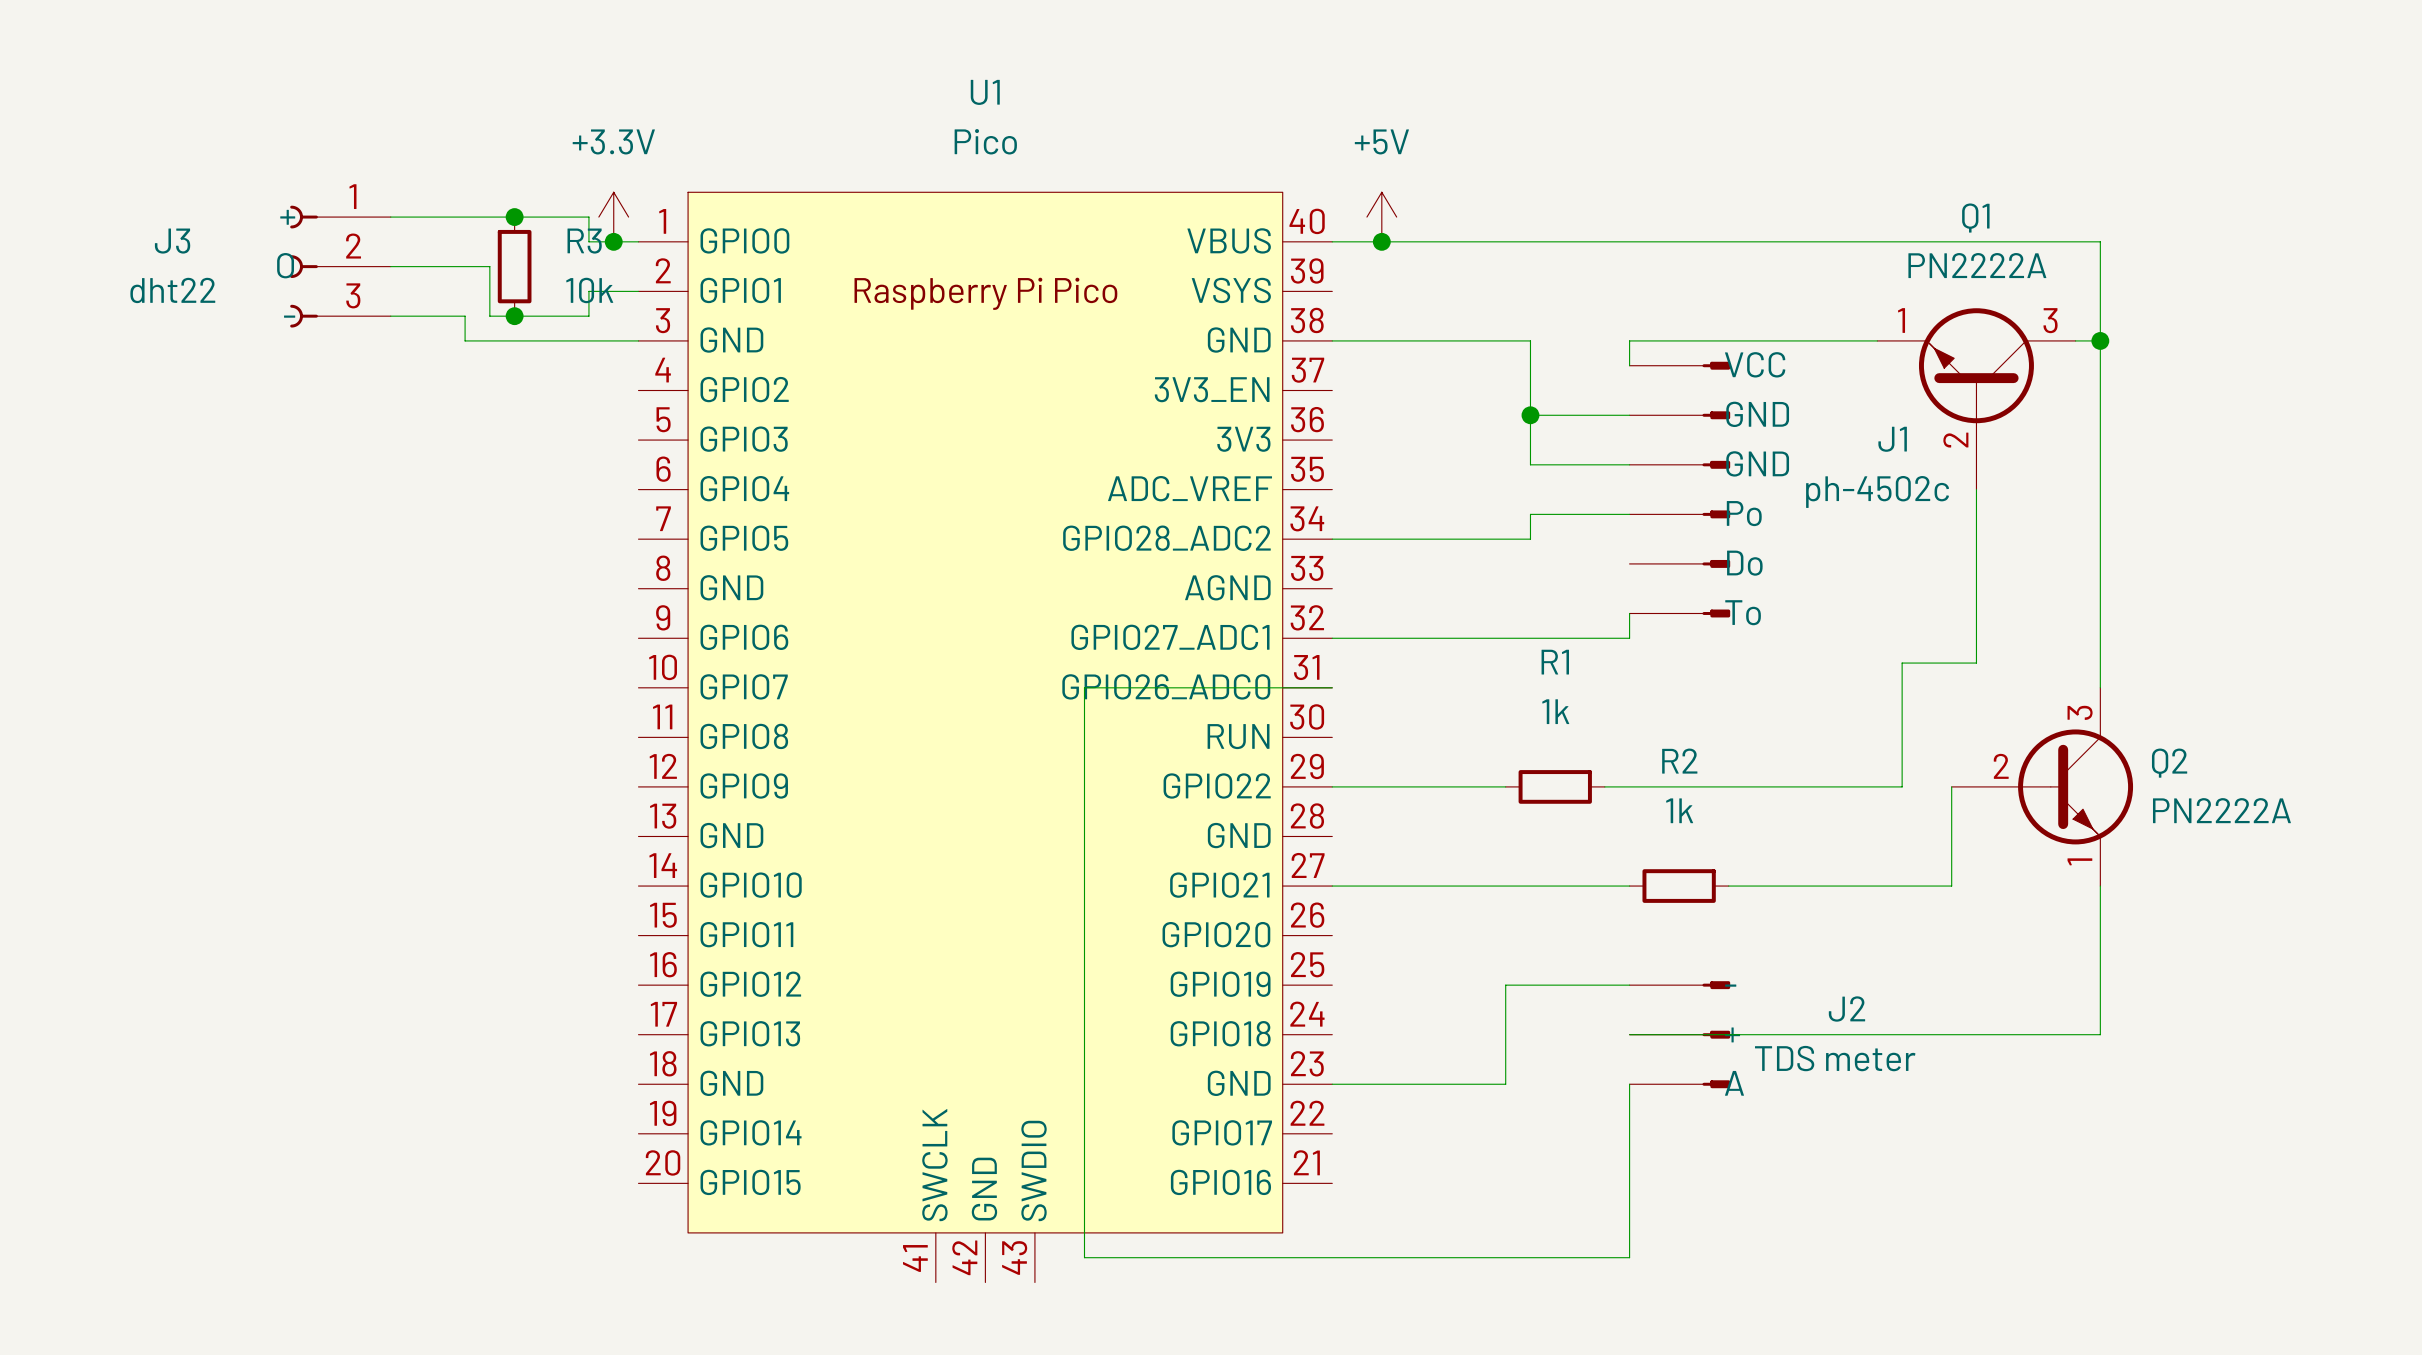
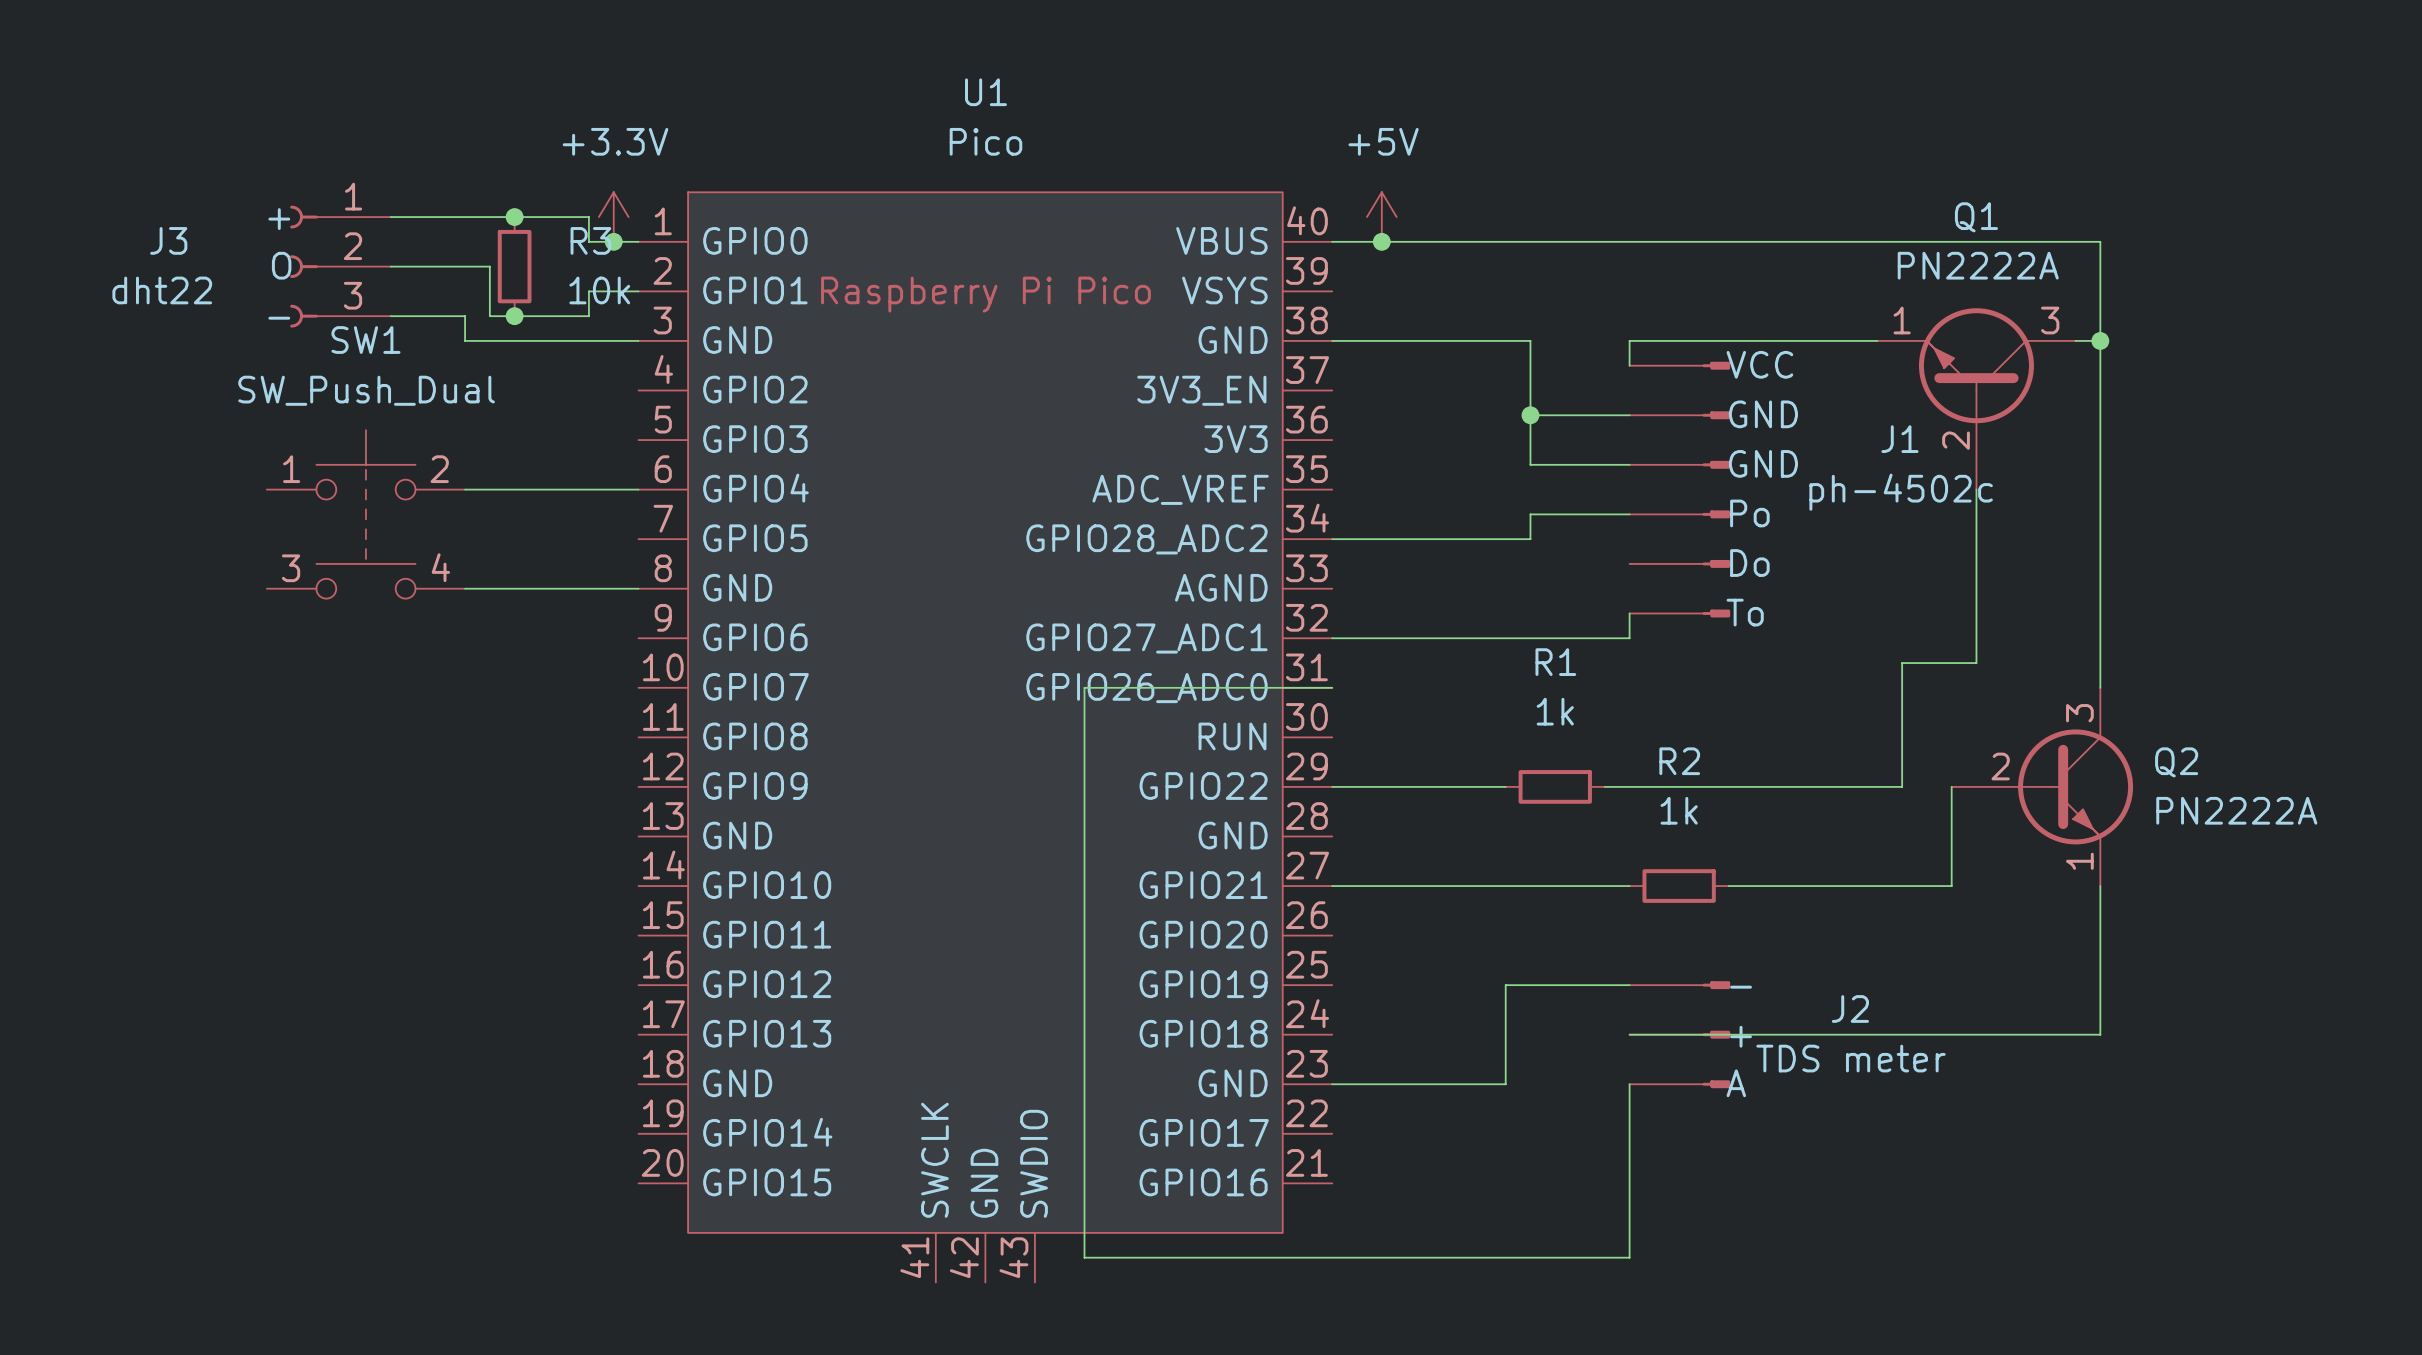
wire: none -> (465, 489) (638, 489)
SW1: none -> SW_Push_Dual (365, 514)
wire: none -> (465, 588) (638, 588)

